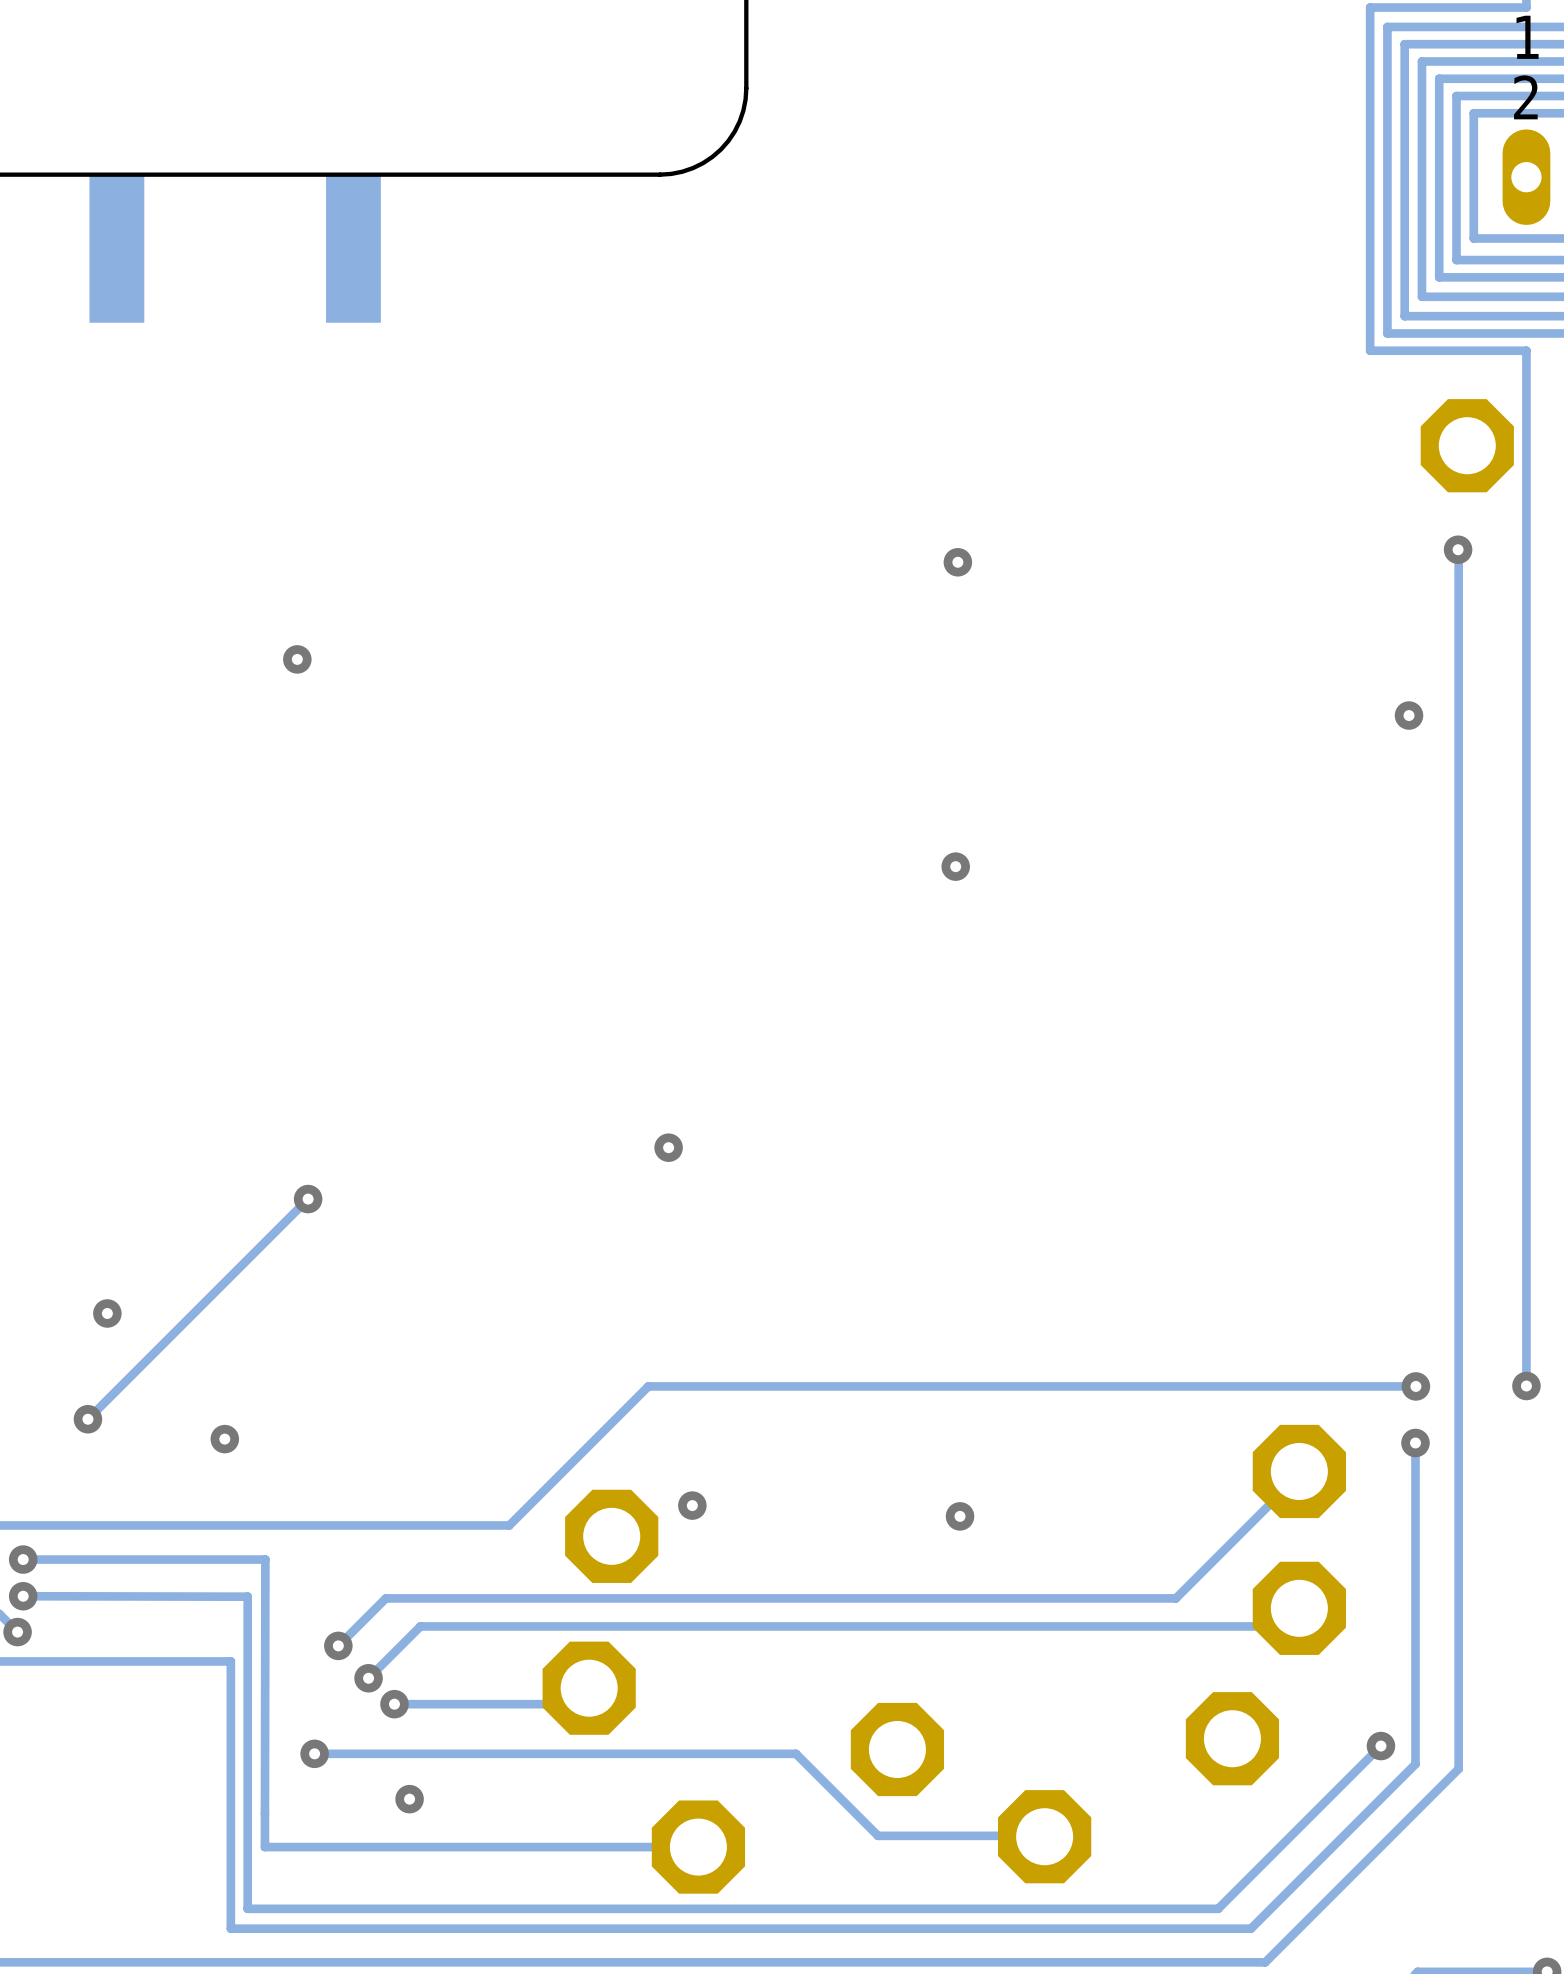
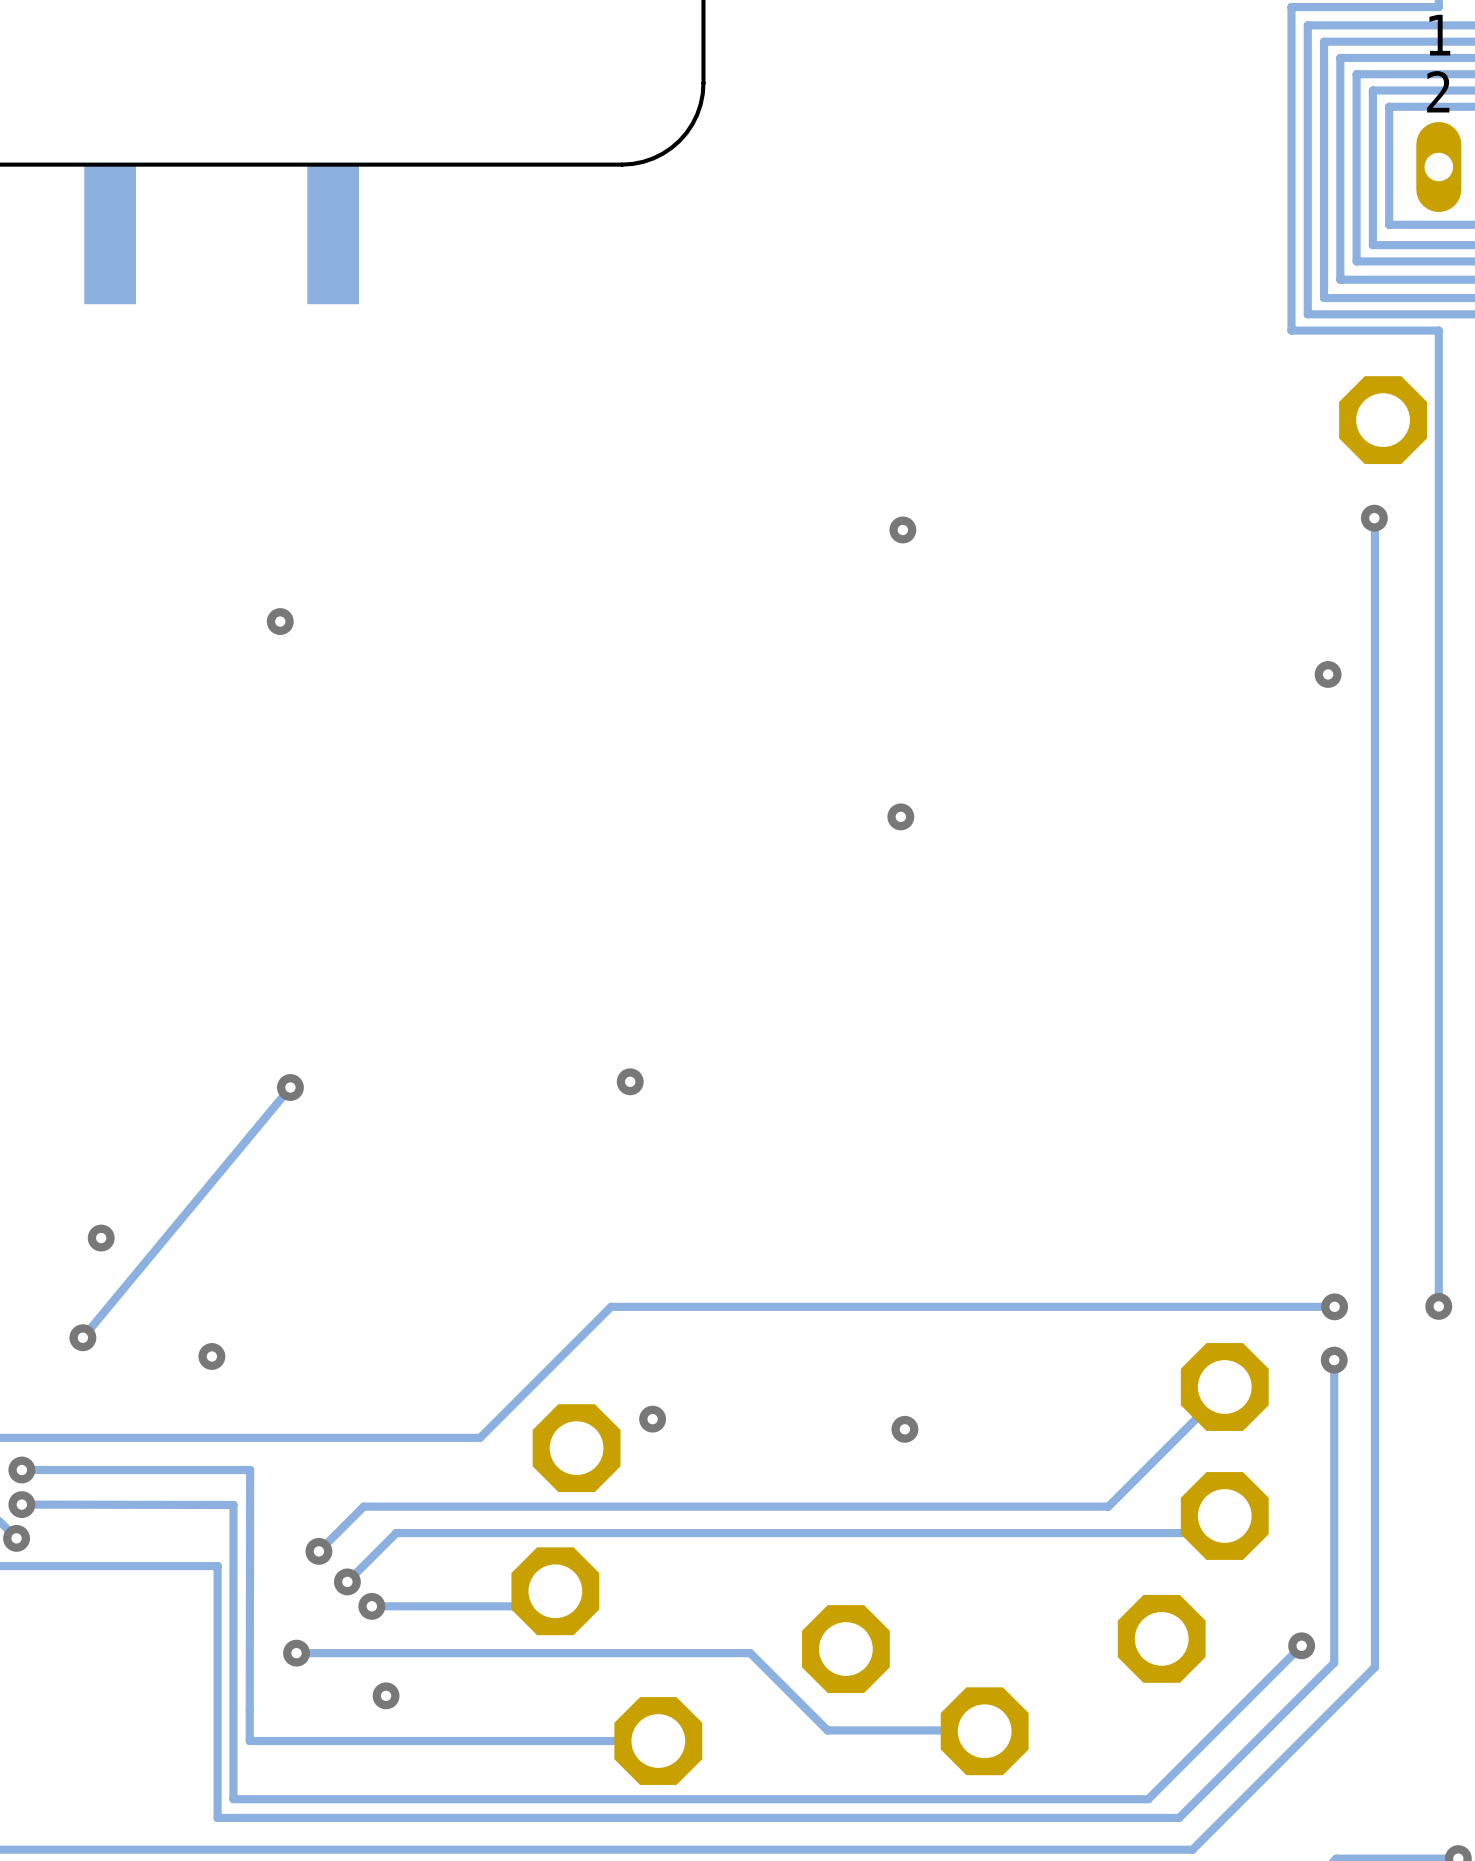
track: (308, 1199) (87, 1419) -> (290, 1087) (82, 1337)
via position: (308, 1199) -> (290, 1087)

